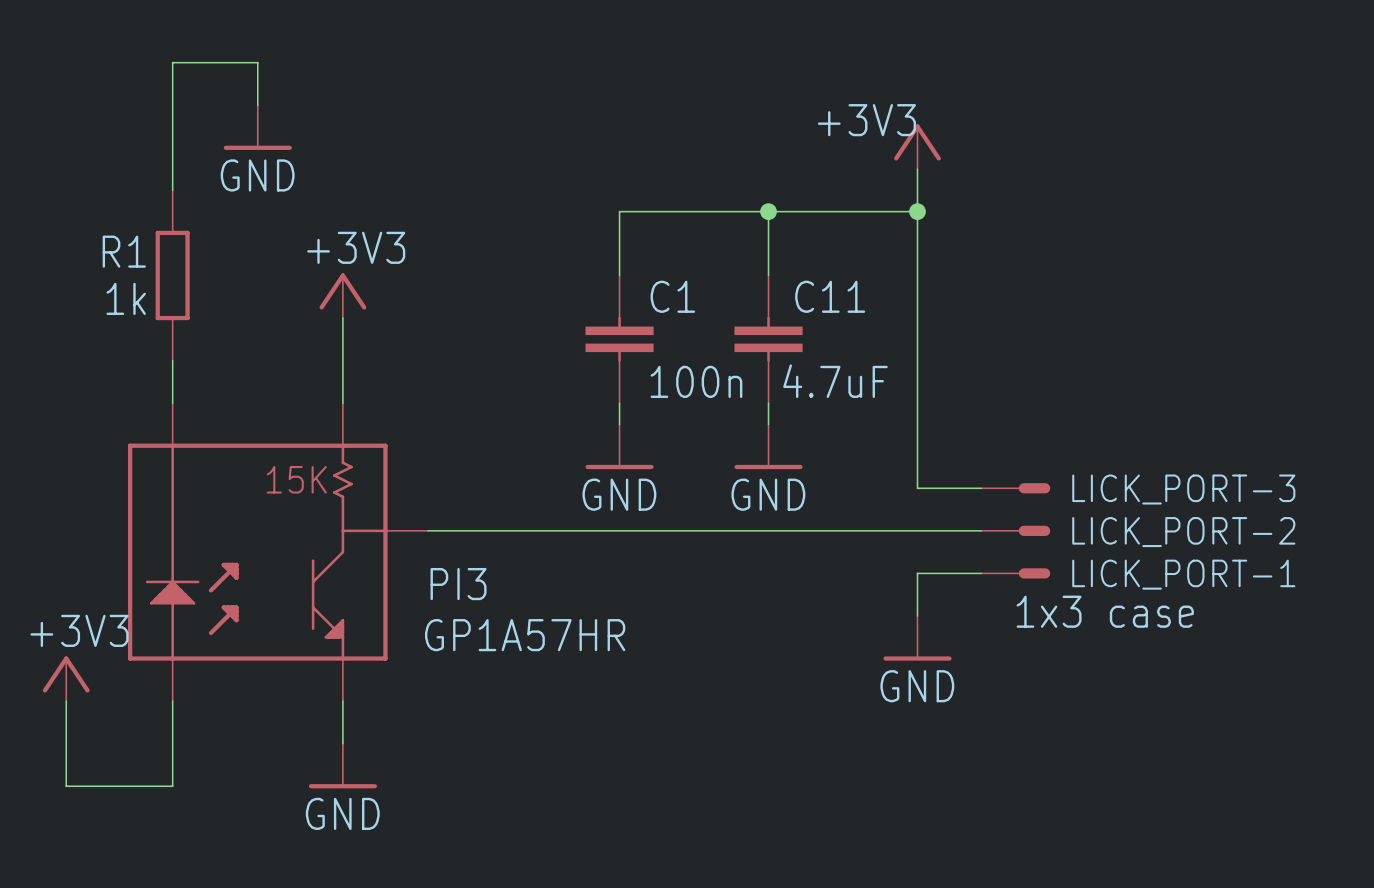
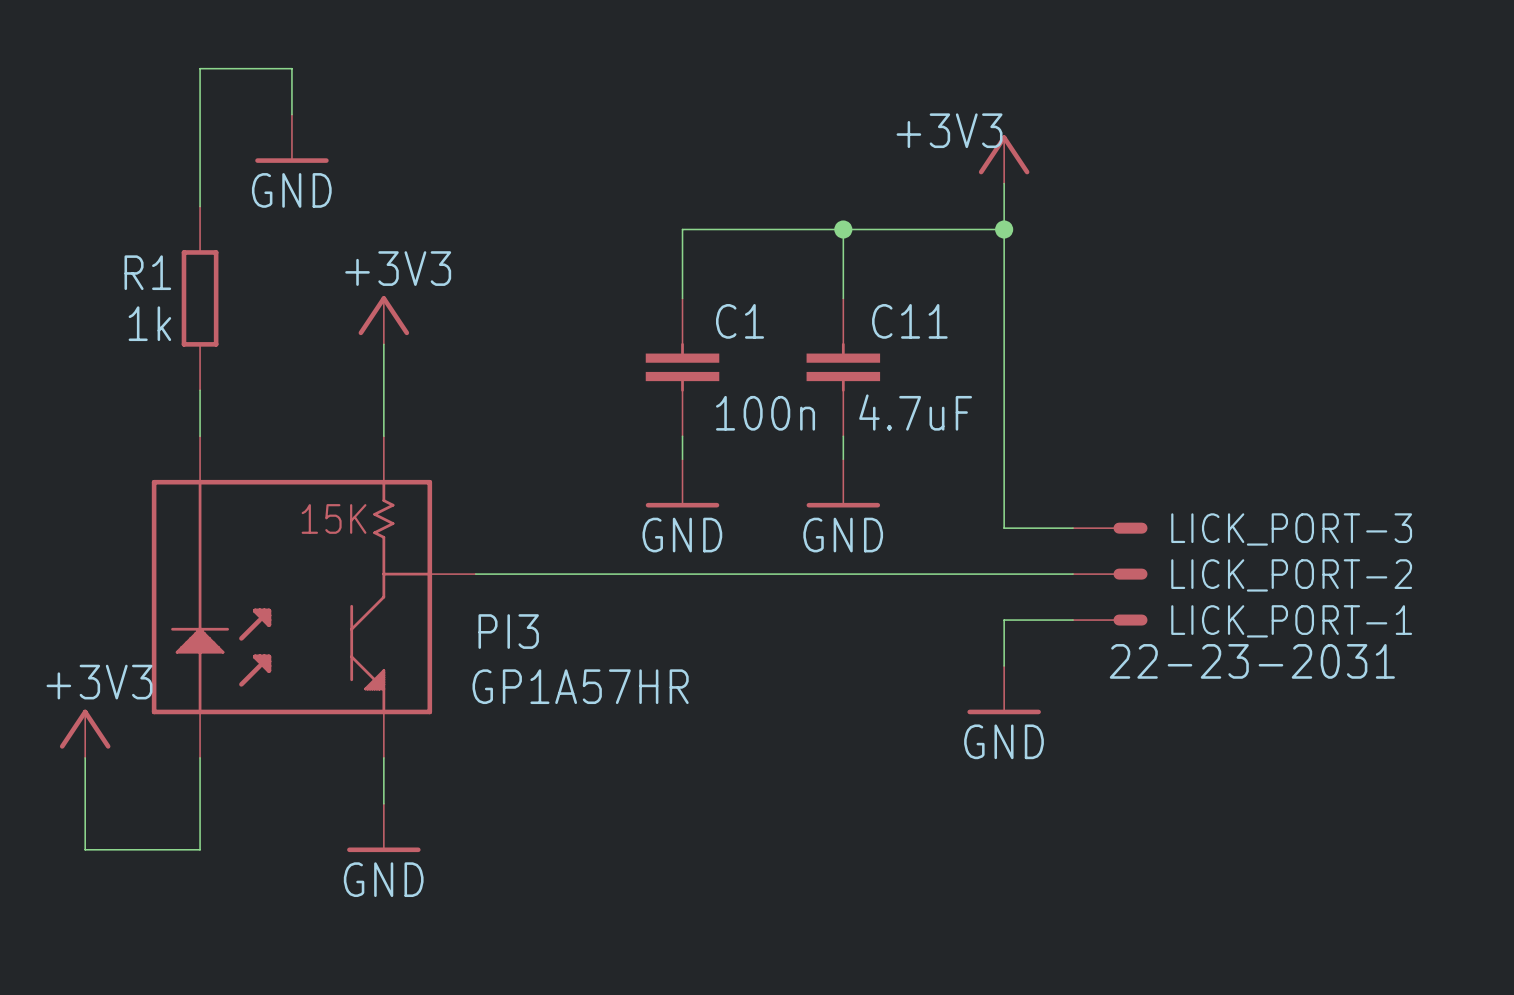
LICK_PORT-1 value: 1x3 case (1105, 611) -> 22-23-2031 (1252, 661)

